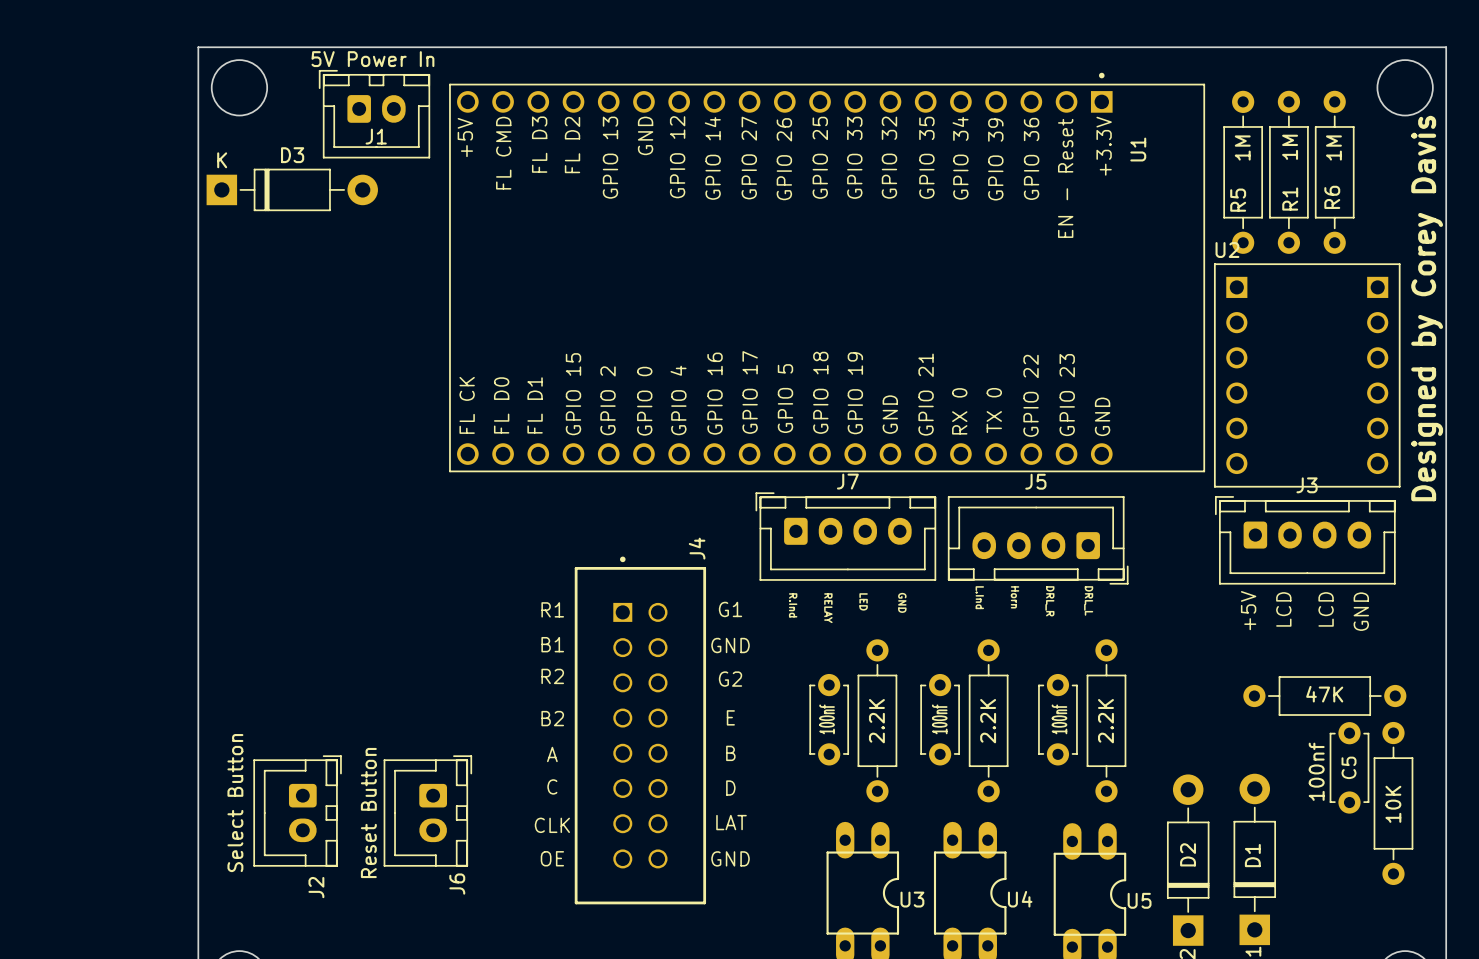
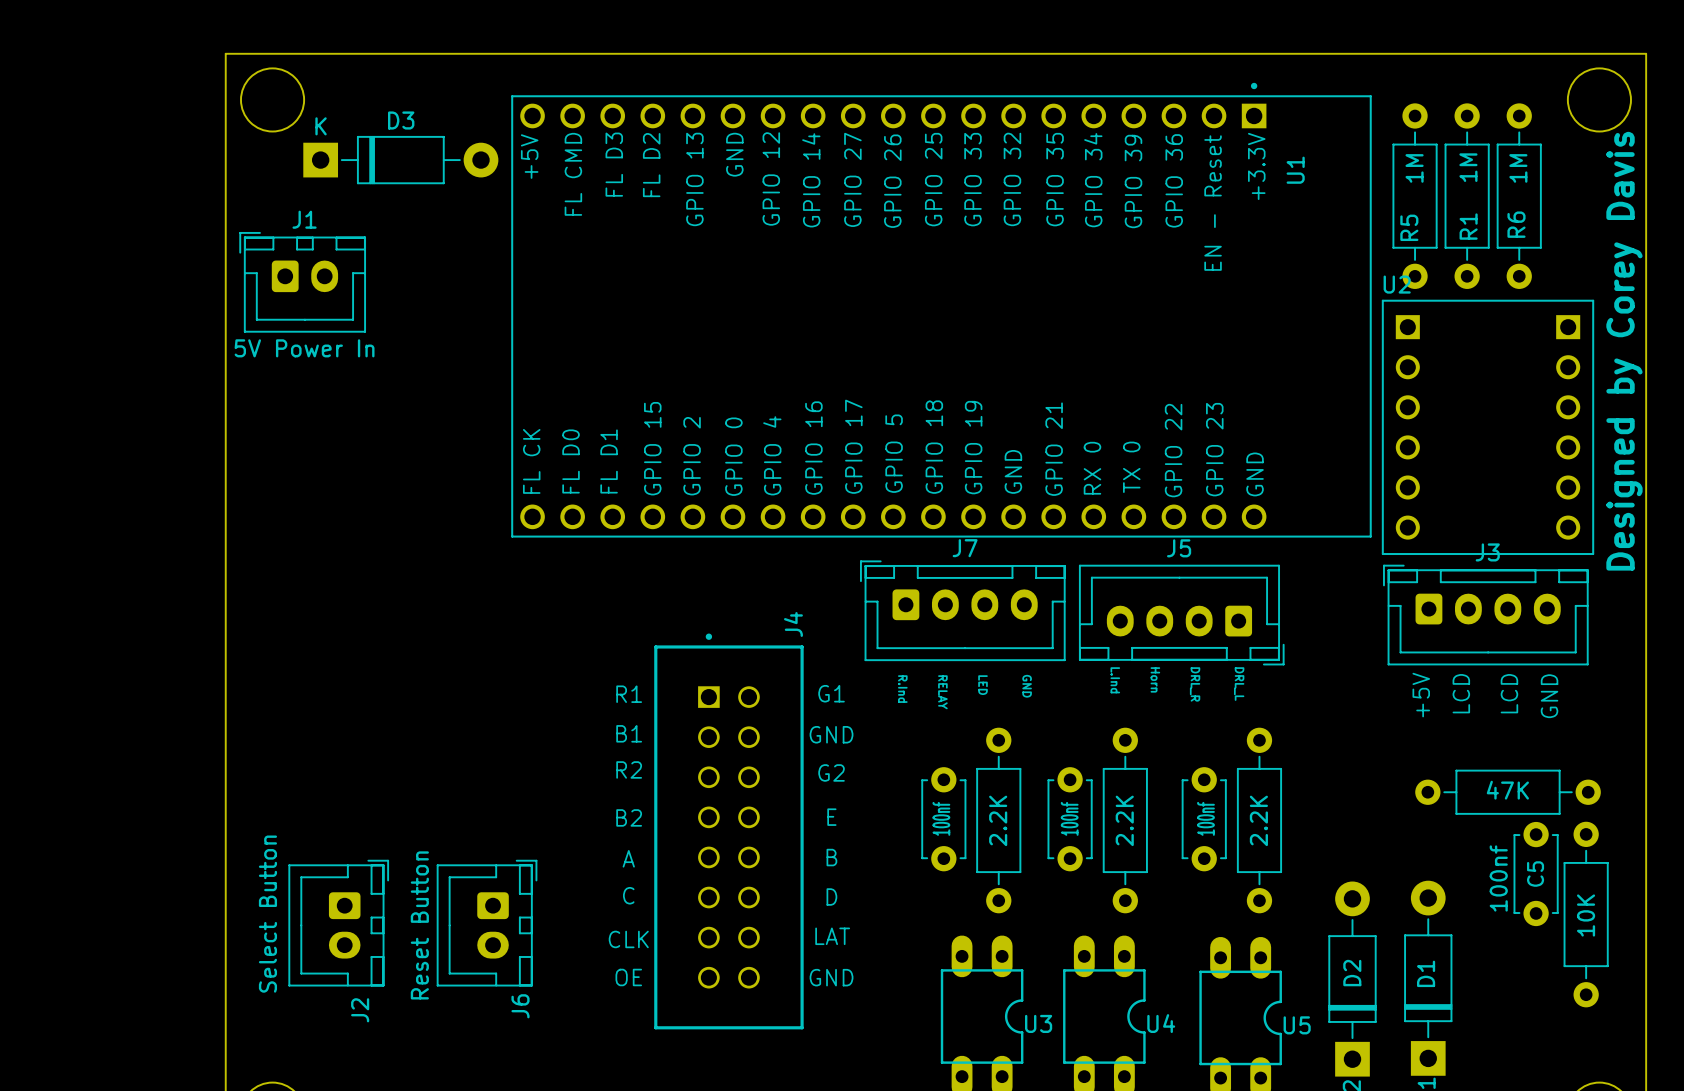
J1 value position: 5V Power In (372, 59) -> 5V Power In (304, 348)
J1 position: (374, 114) -> (302, 282)
J1 name position: J1 (376, 136) -> J1 (304, 219)
D3 position: (292, 189) -> (400, 160)

